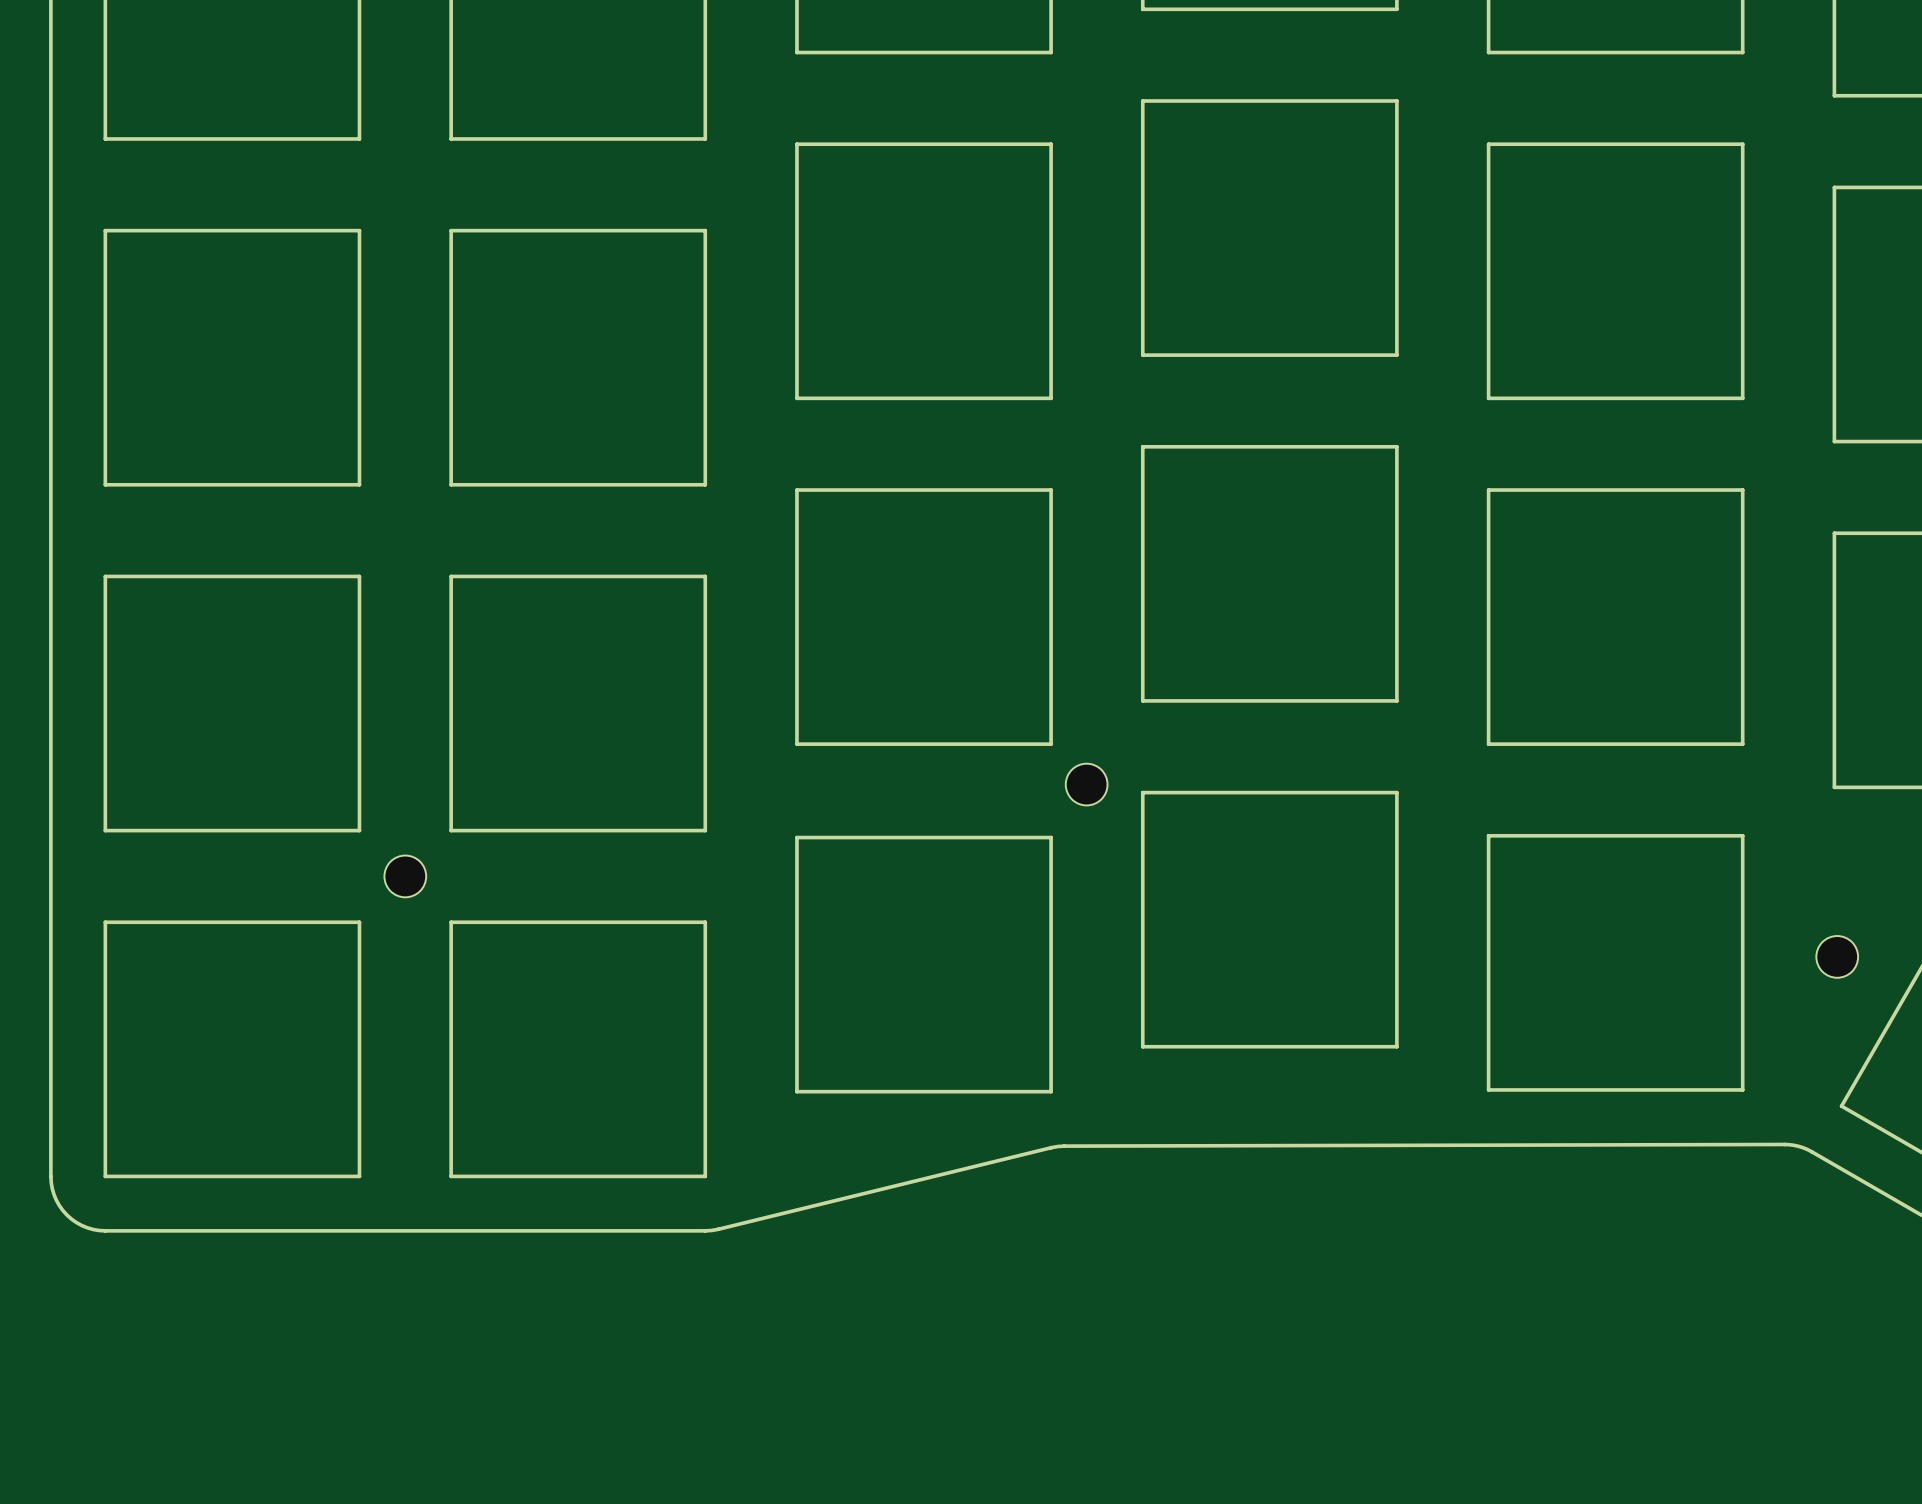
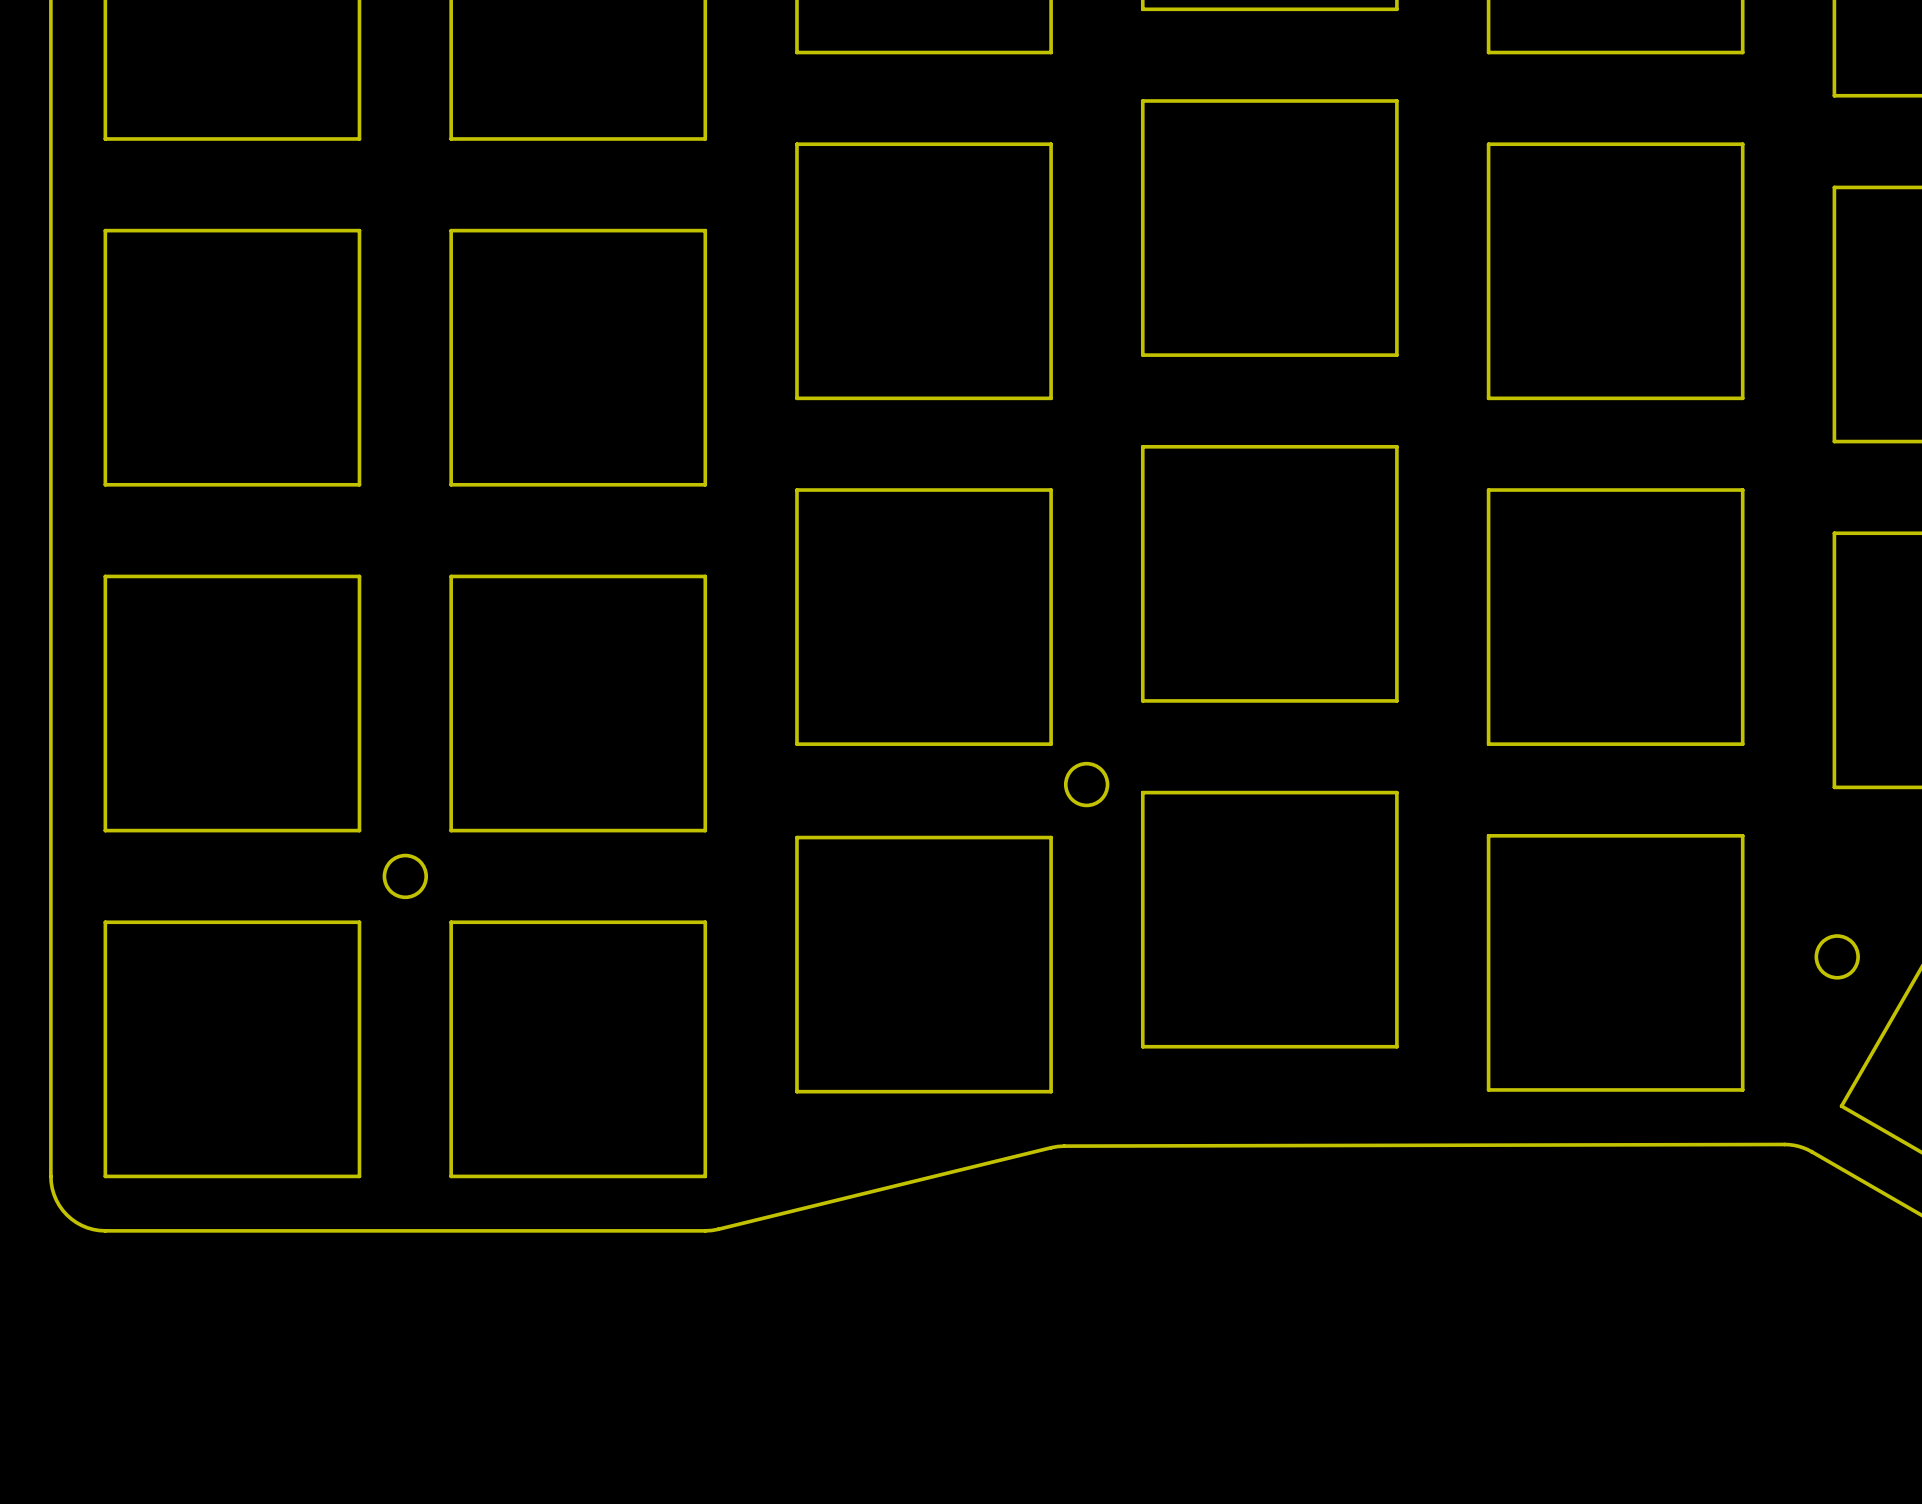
round board edge: none -> [1063, 761, 1110, 808]
part: (1086, 784) -> none
round board edge: none -> [382, 853, 429, 900]
part: (405, 876) -> none
round board edge: none -> [1814, 934, 1860, 980]
part: (1837, 956) -> none

